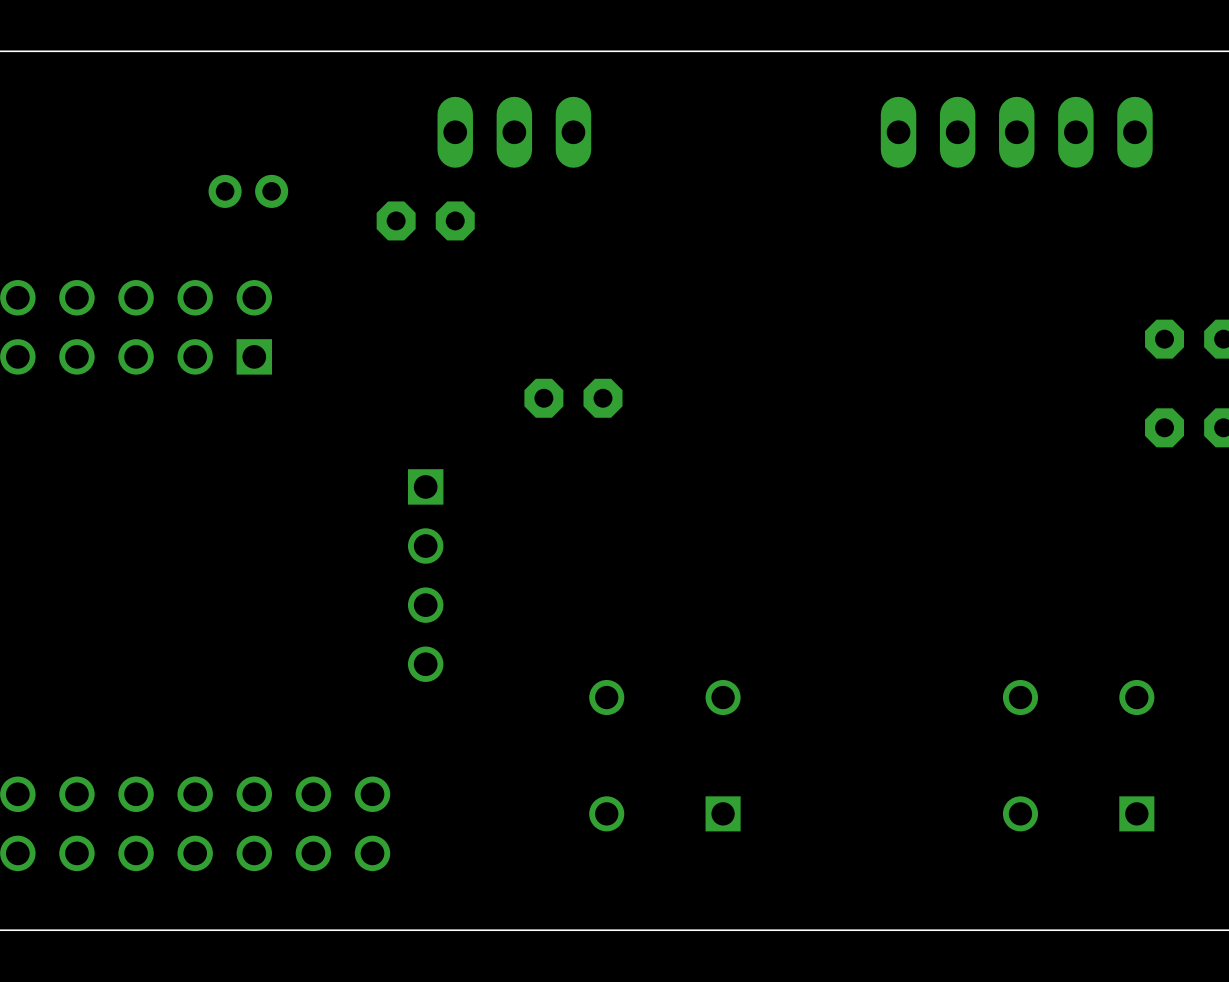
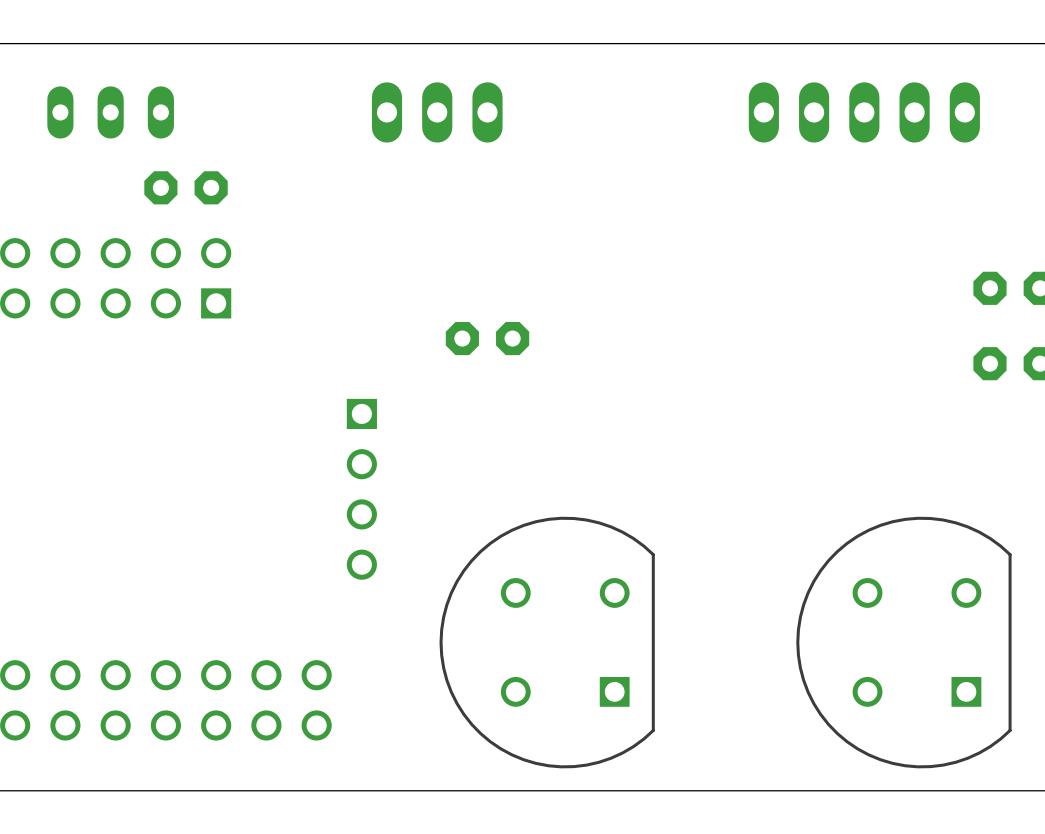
part: none -> (110, 112)
part: (248, 191) -> none
part position: (425, 220) -> (186, 187)
line: none -> (653, 554) (653, 730) (633, 746) (611, 758) (586, 765) (561, 766) (535, 763) (511, 754) (480, 733) (463, 714) (451, 692) (443, 667) (441, 642) (443, 617) (451, 593) (463, 570) (480, 551) (511, 530) (535, 521) (561, 518) (586, 520) (611, 526) (633, 538) (653, 554)
line: none -> (1010, 554) (1010, 730) (990, 746) (967, 758) (943, 765) (917, 766) (892, 763) (868, 754) (837, 733) (820, 714) (808, 692) (800, 667) (797, 642) (800, 617) (808, 593) (820, 570) (837, 551) (868, 530) (892, 521) (917, 518) (943, 520) (967, 526) (990, 538) (1010, 554)

